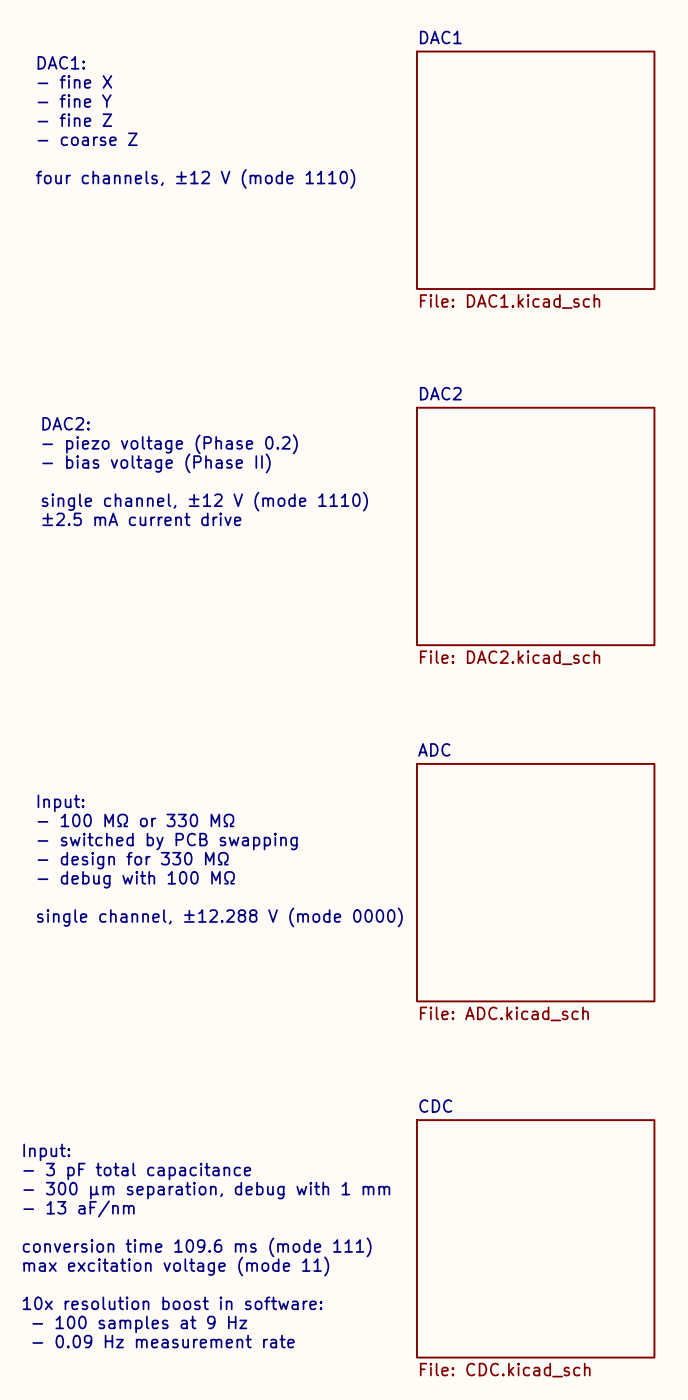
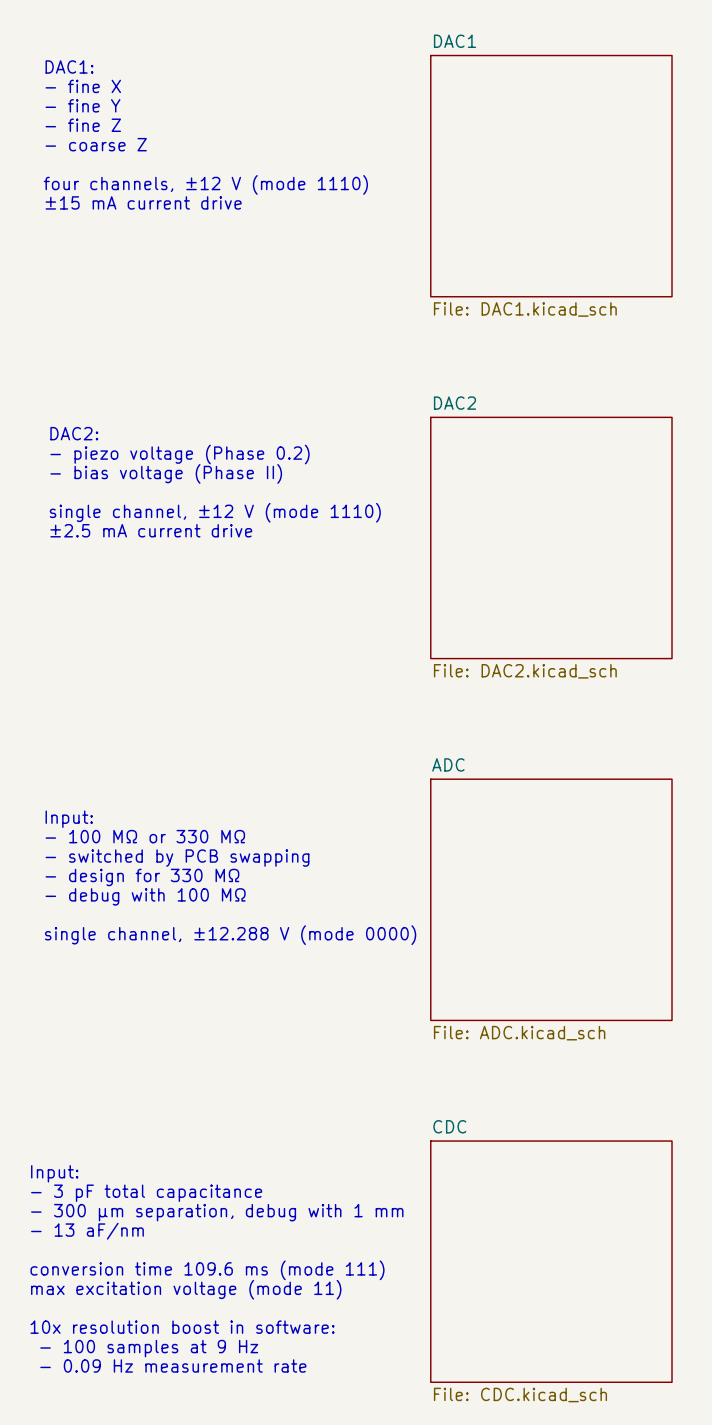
text: none -> ±15 mA current drive (143, 202)

